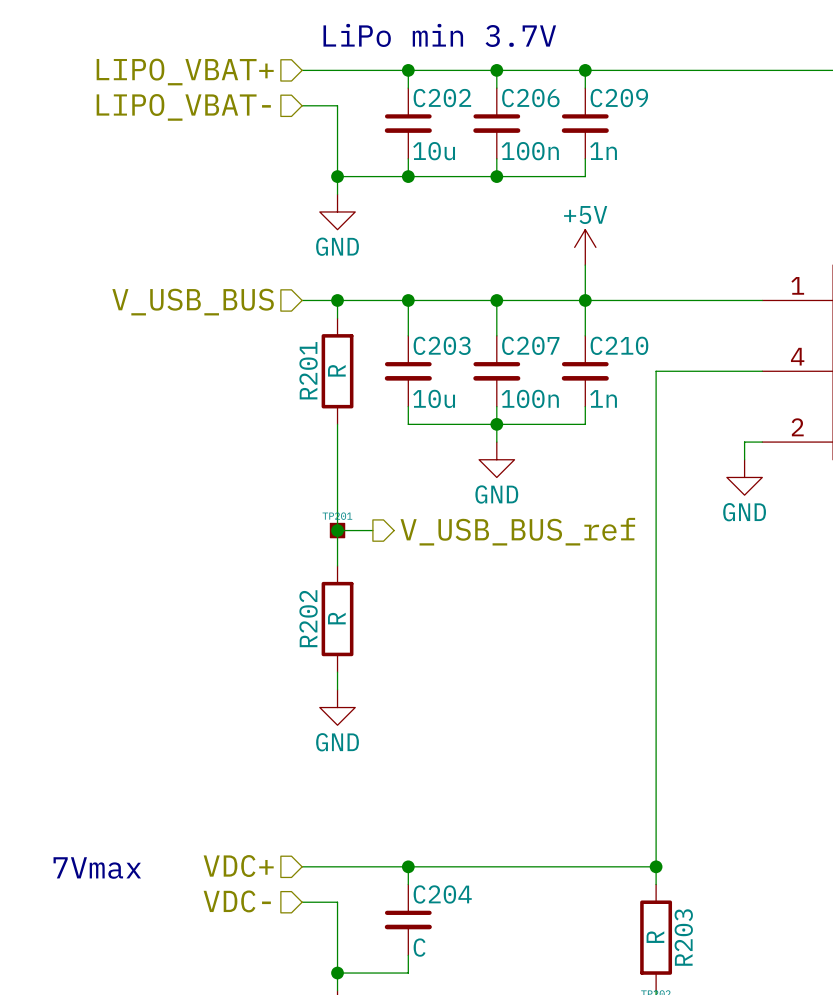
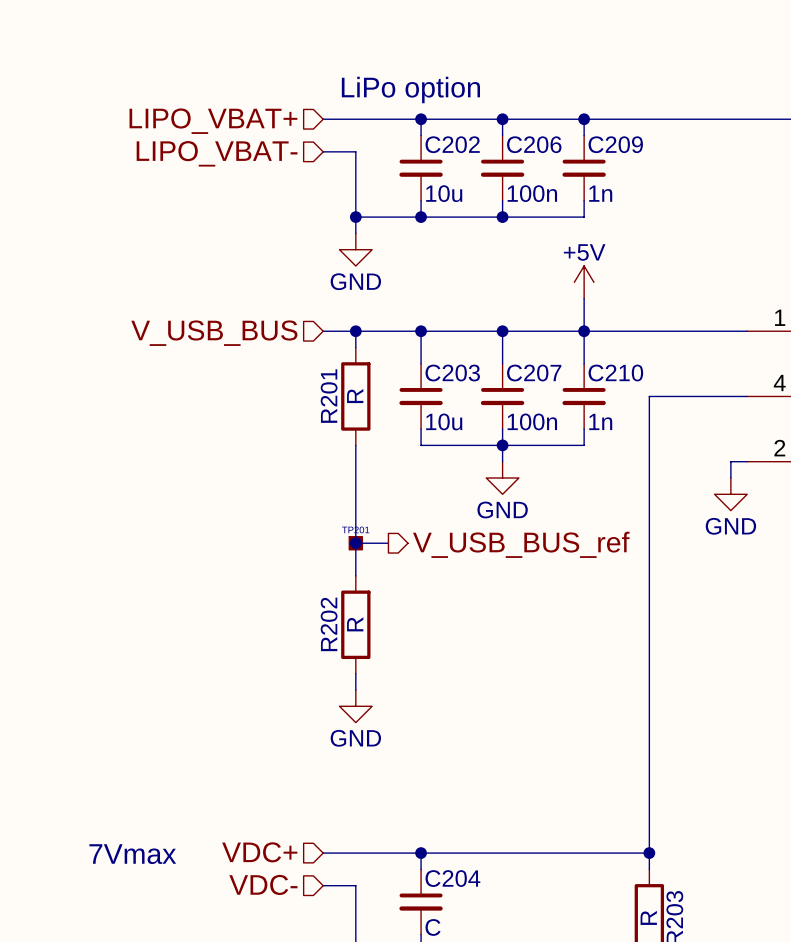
text: LiPo min 3.7V (439, 35) -> LiPo option (410, 89)

